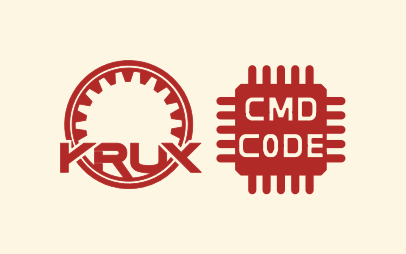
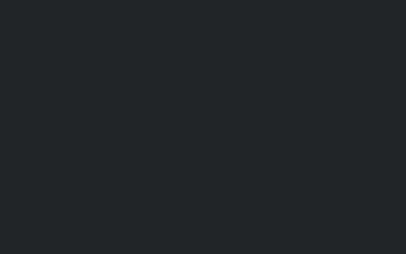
part: (130, 124) -> none
part: (280, 129) -> none

